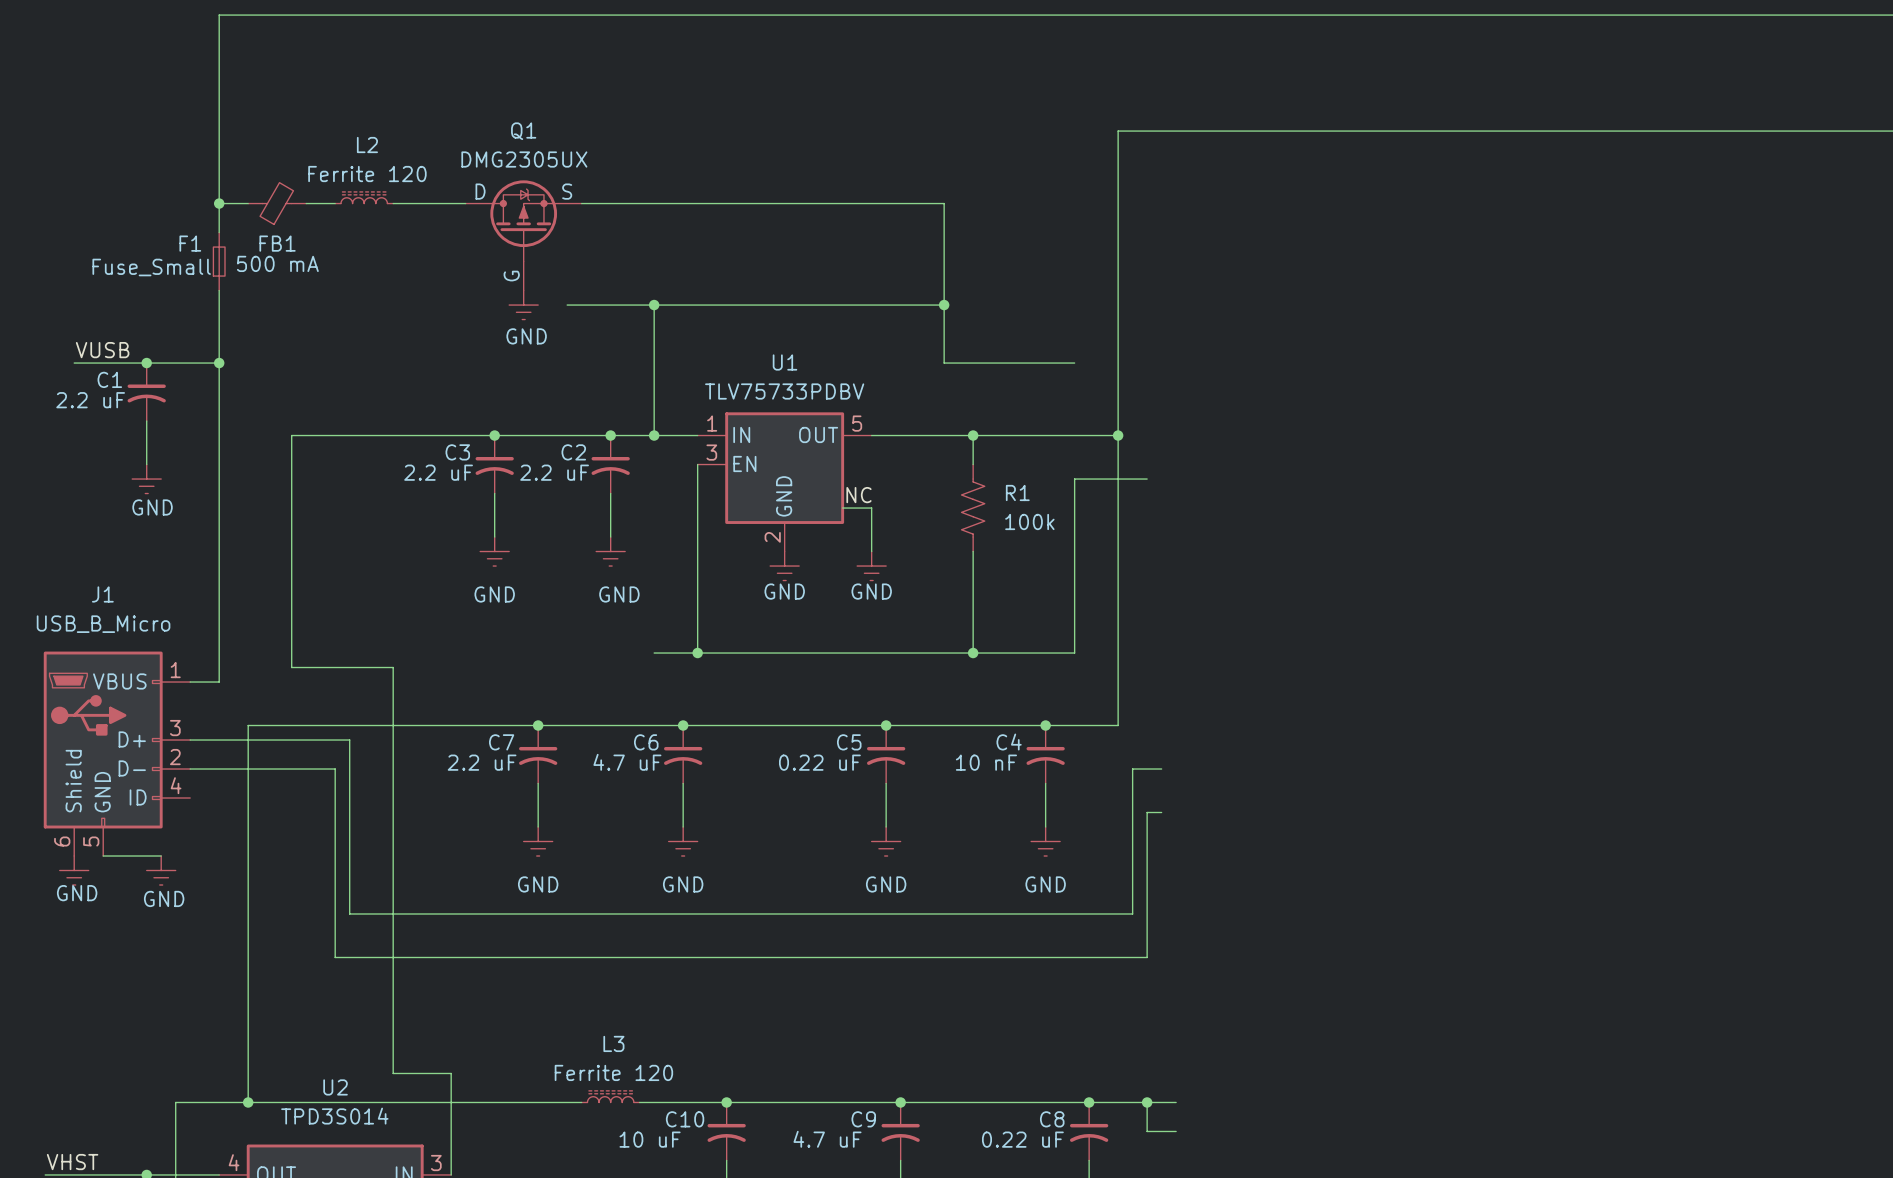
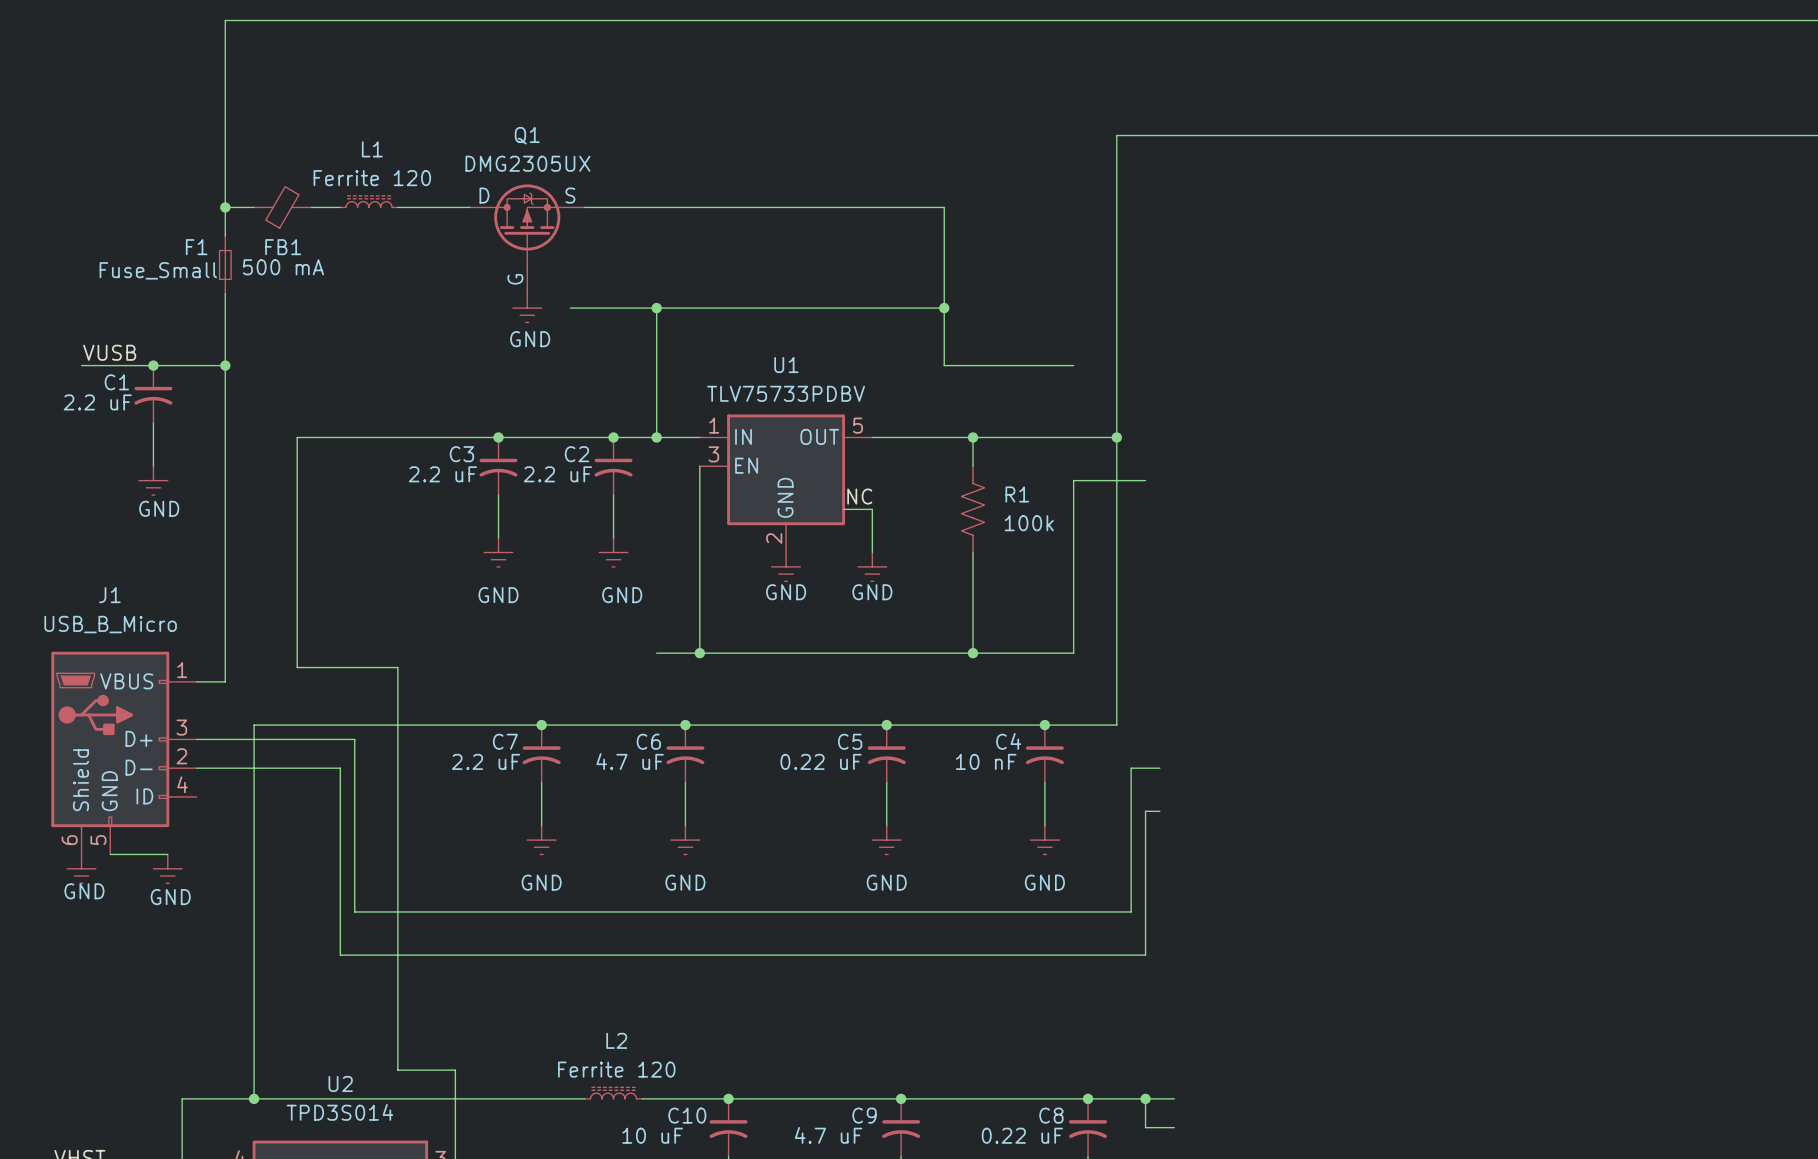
L2 name: L2 (367, 145) -> L1 (372, 149)
L3 name: L3 (613, 1043) -> L2 (616, 1040)

